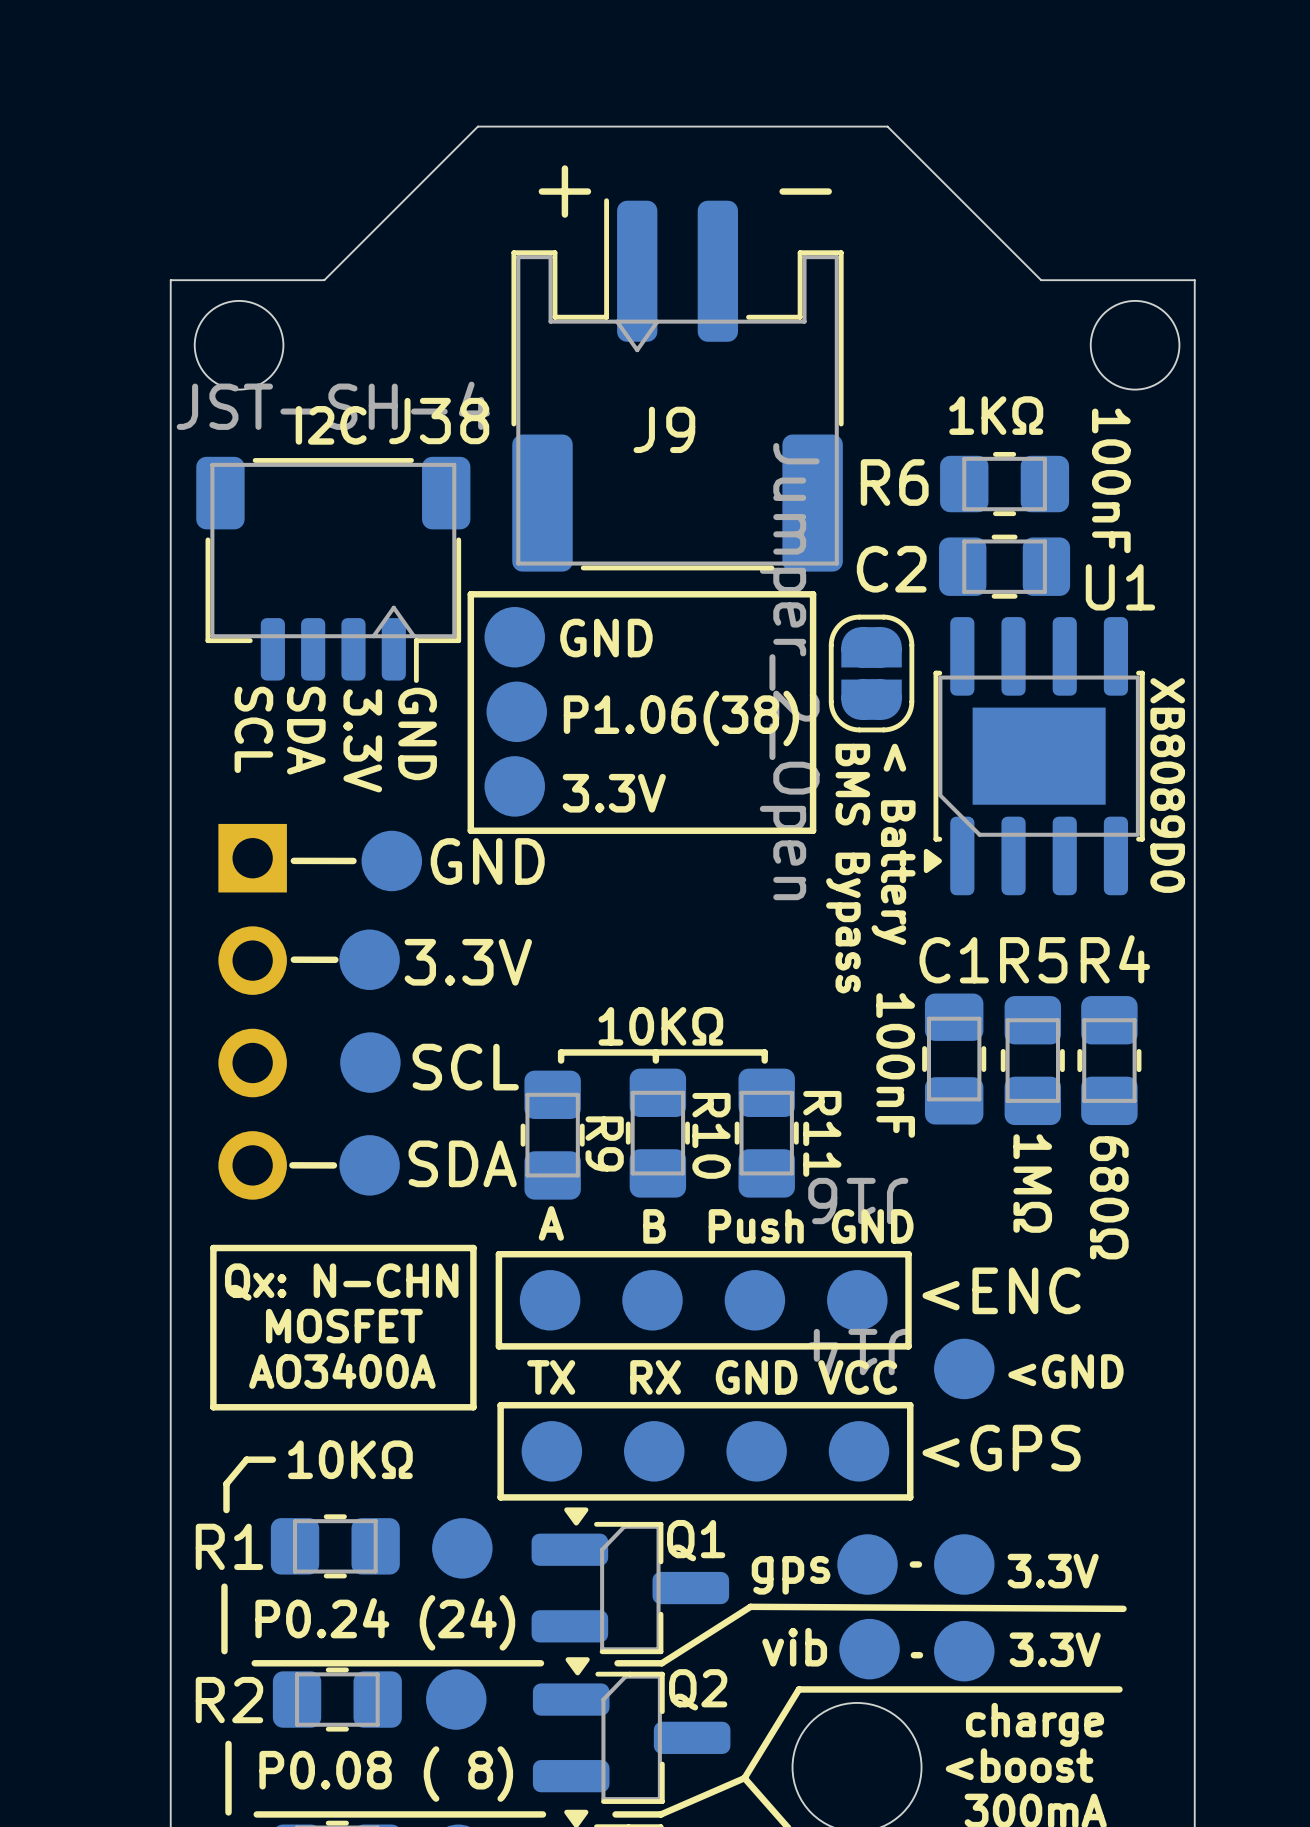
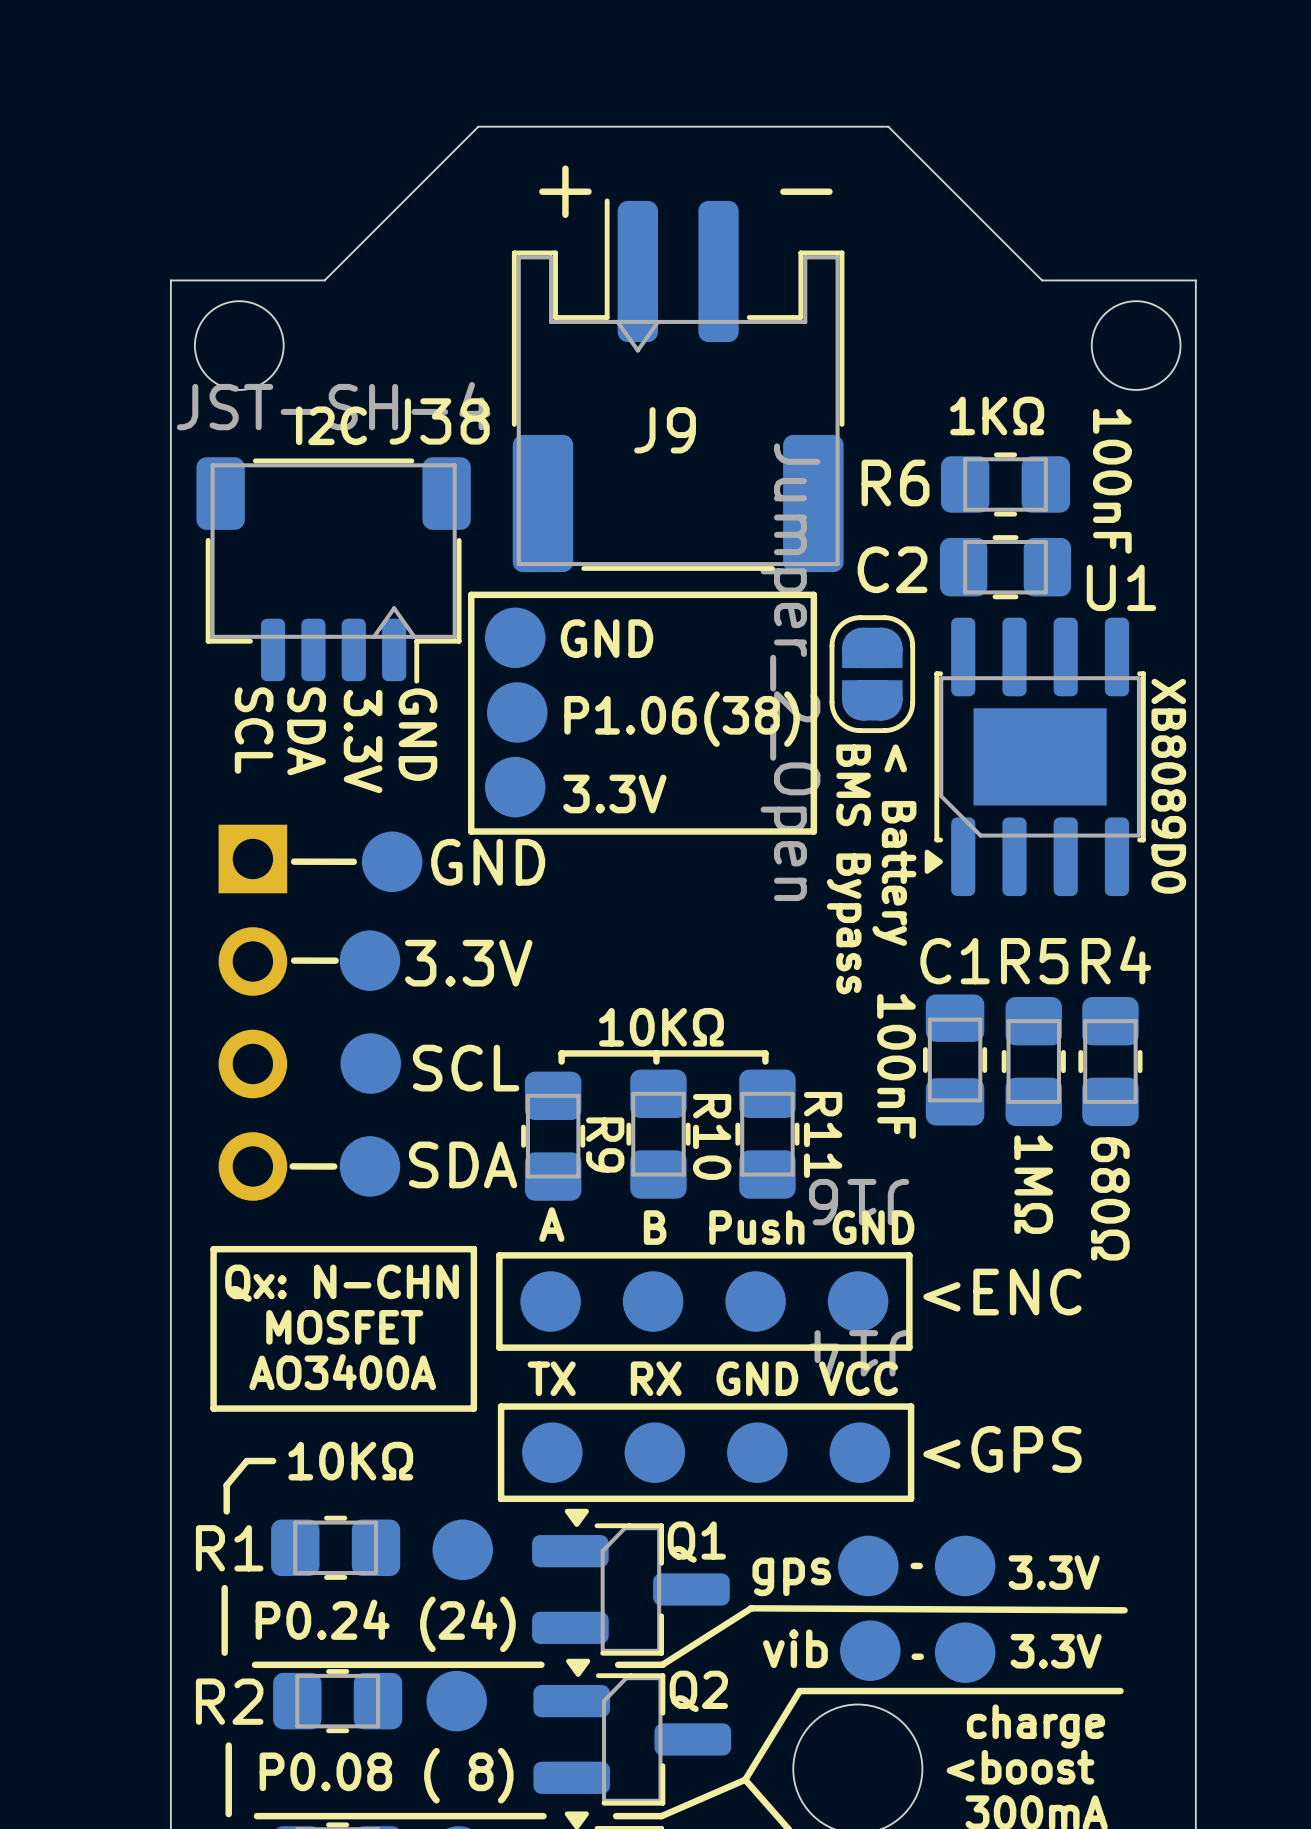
part: (964, 1368) -> none
text: <GND (1065, 1371) -> none

